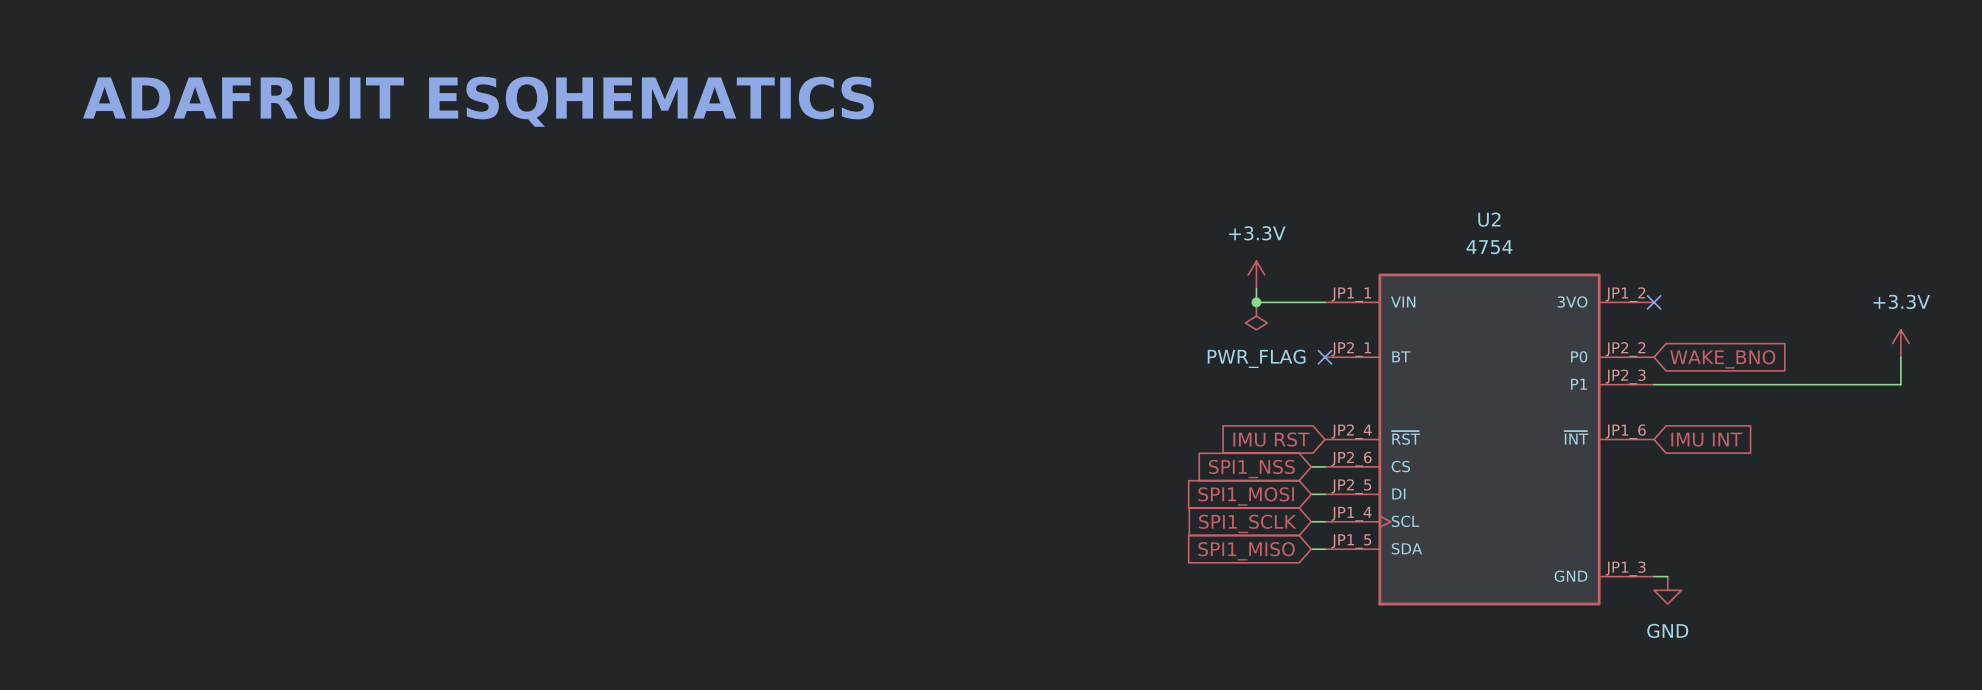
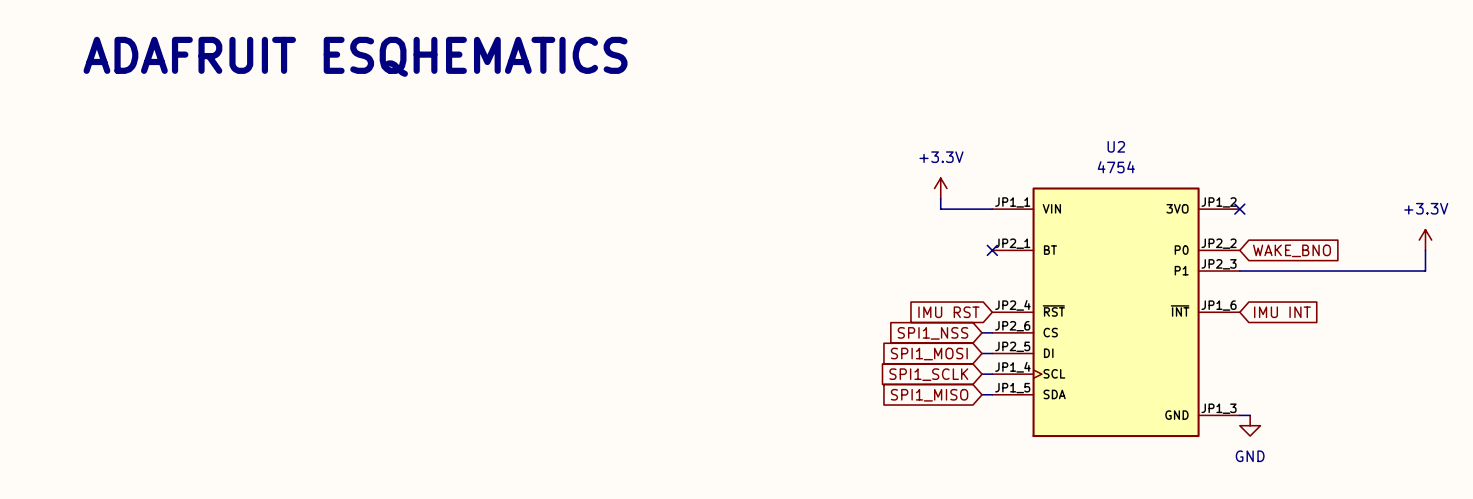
junction: (1256, 302) -> none
power symbol: PWR_FLAG (1256, 316) -> none

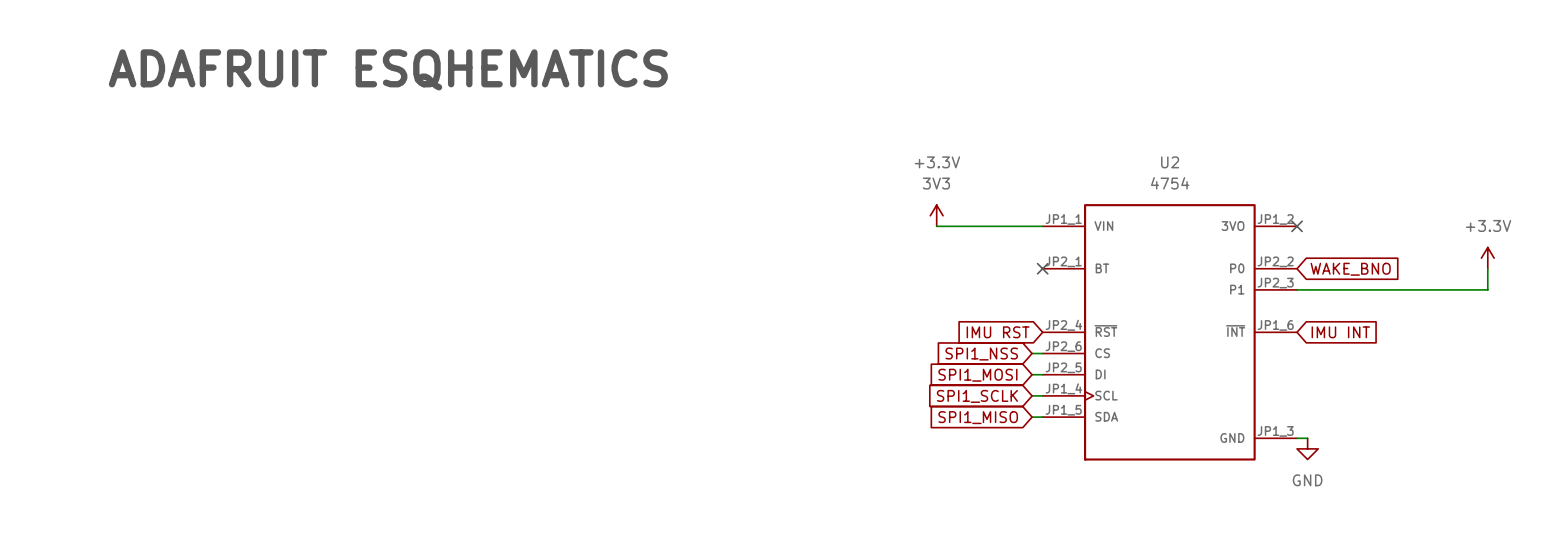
power symbol: +3.3V (940, 188) -> none
power symbol: none -> +3.3V (936, 215)
wire: (940, 198) (940, 209) -> (936, 226) (989, 226)

